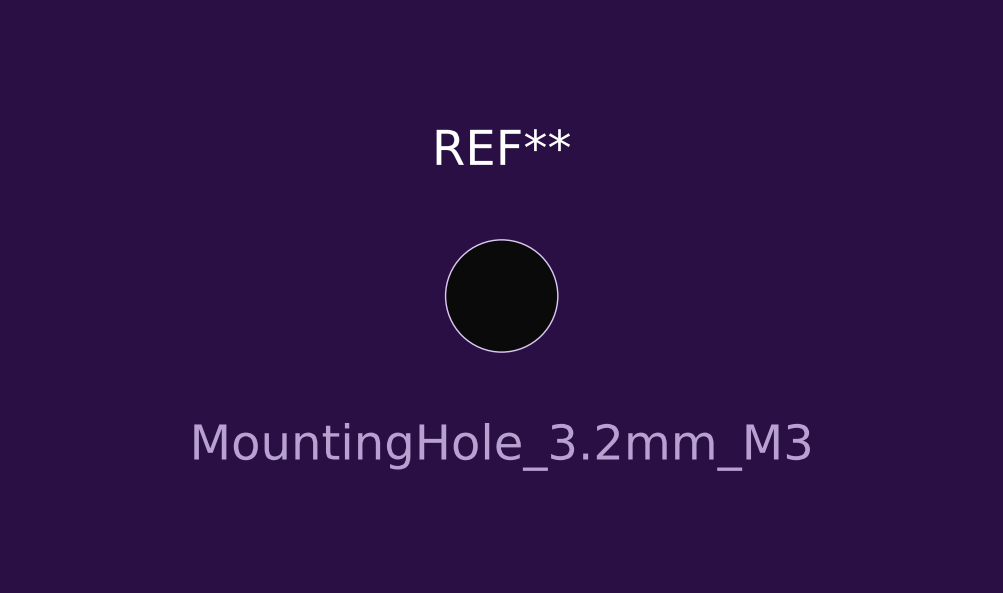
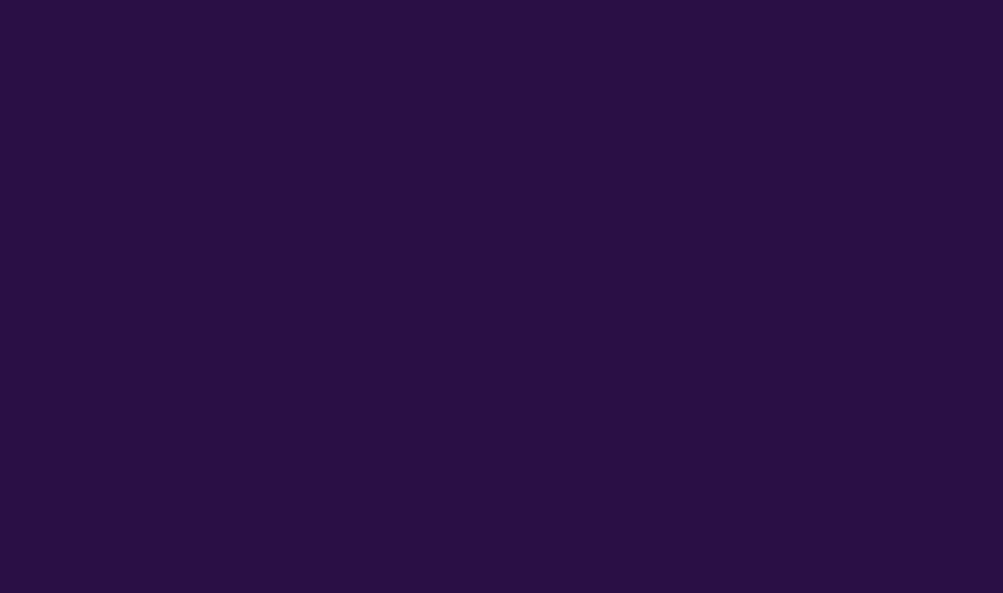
REF**: MountingHole_3.2mm_M3 (501, 295) -> none

